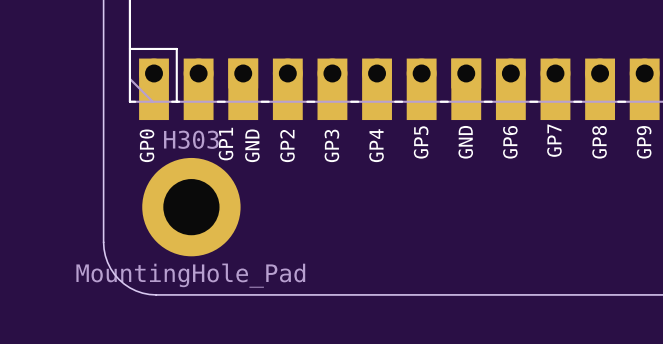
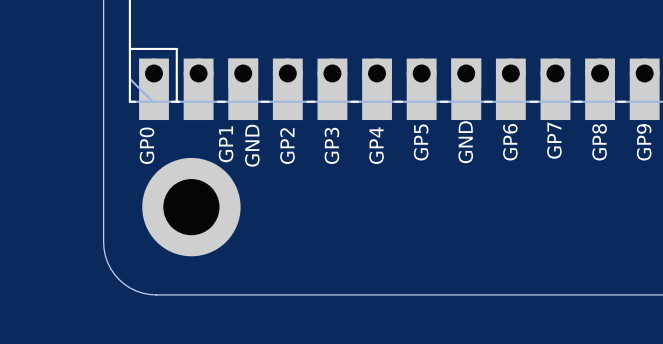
H303 name: H303 (191, 139) -> none
H303 value: MountingHole_Pad (190, 275) -> none

